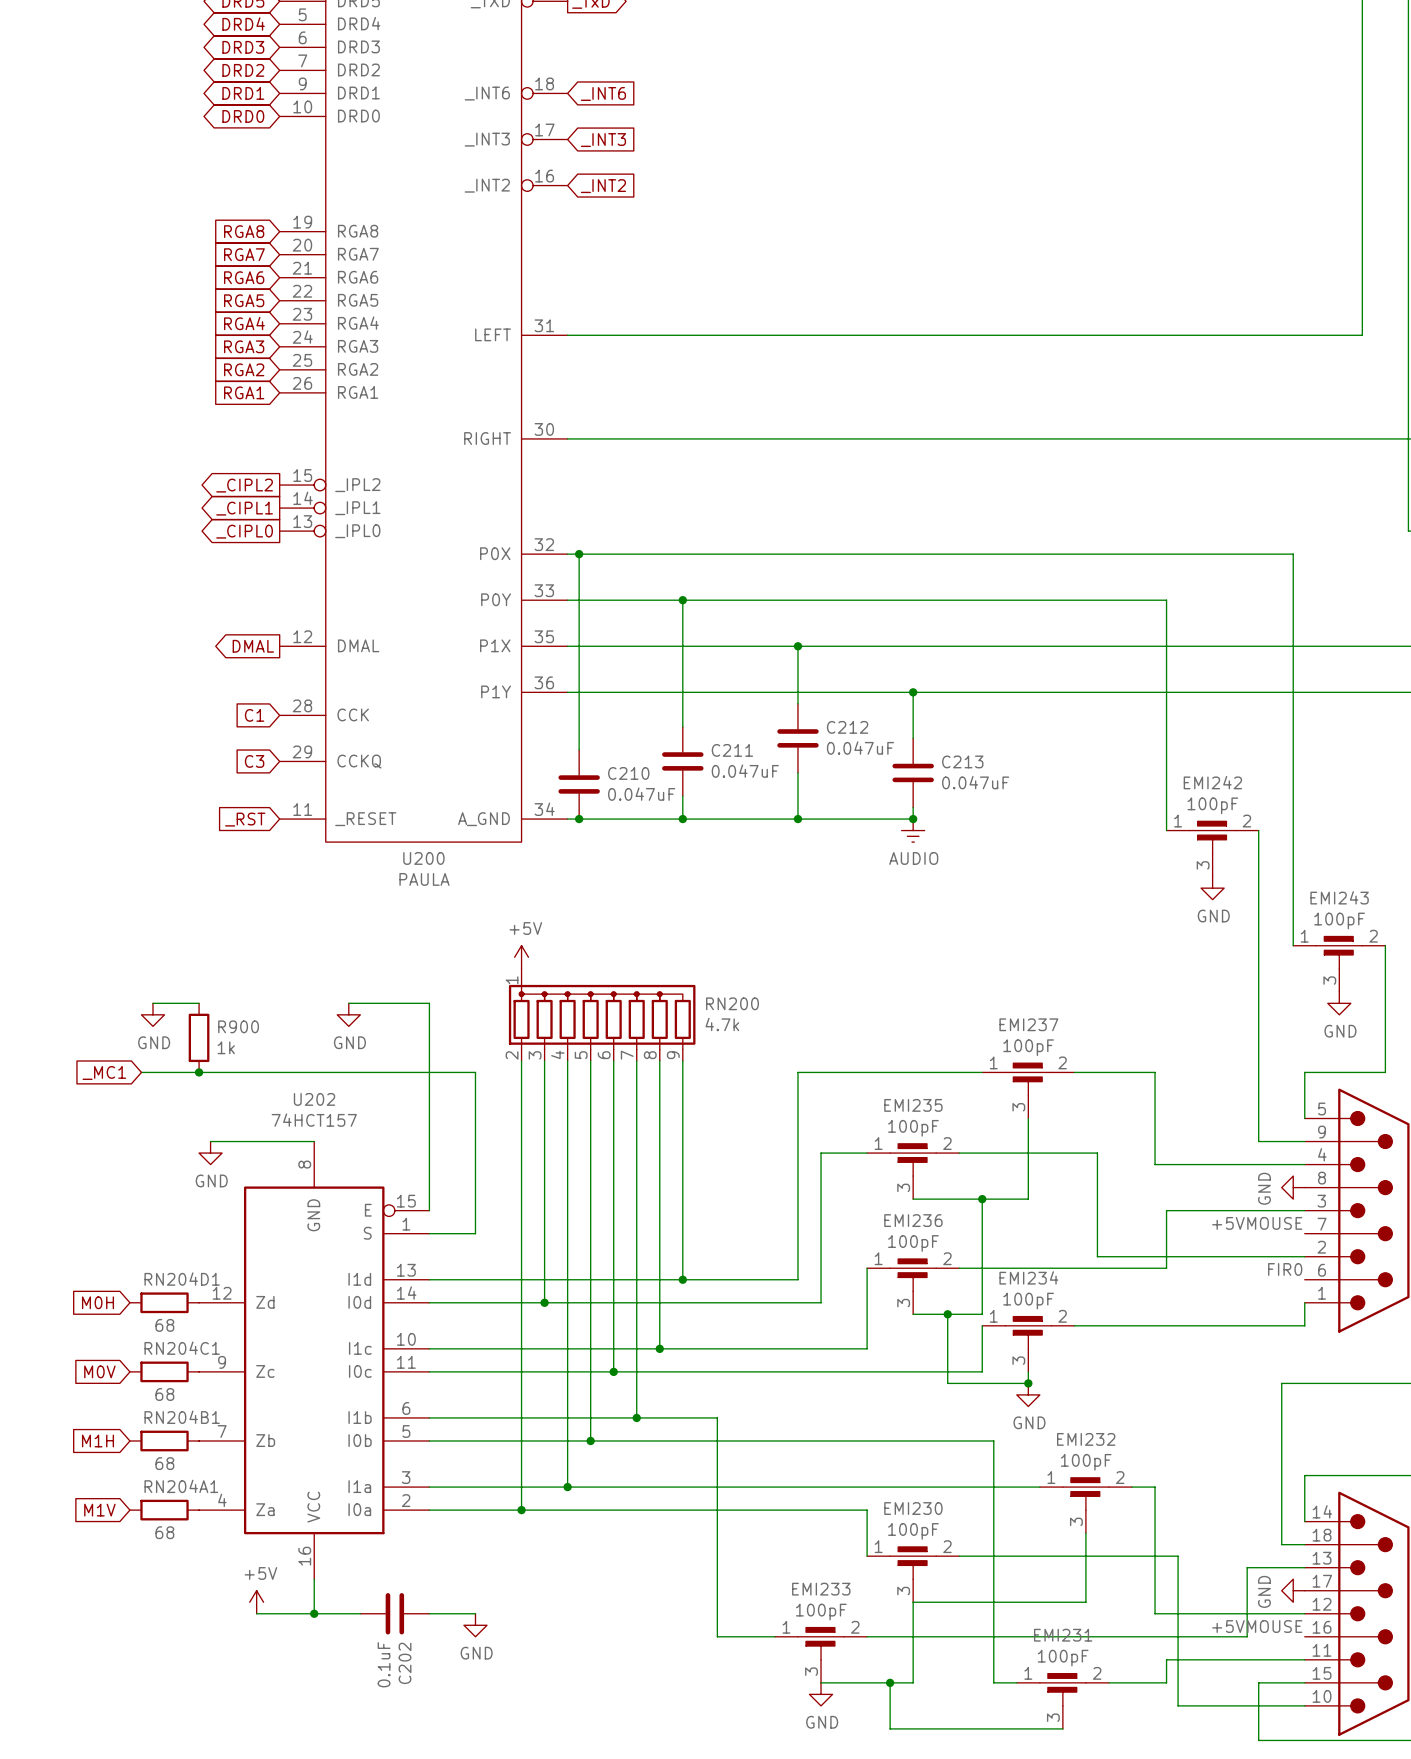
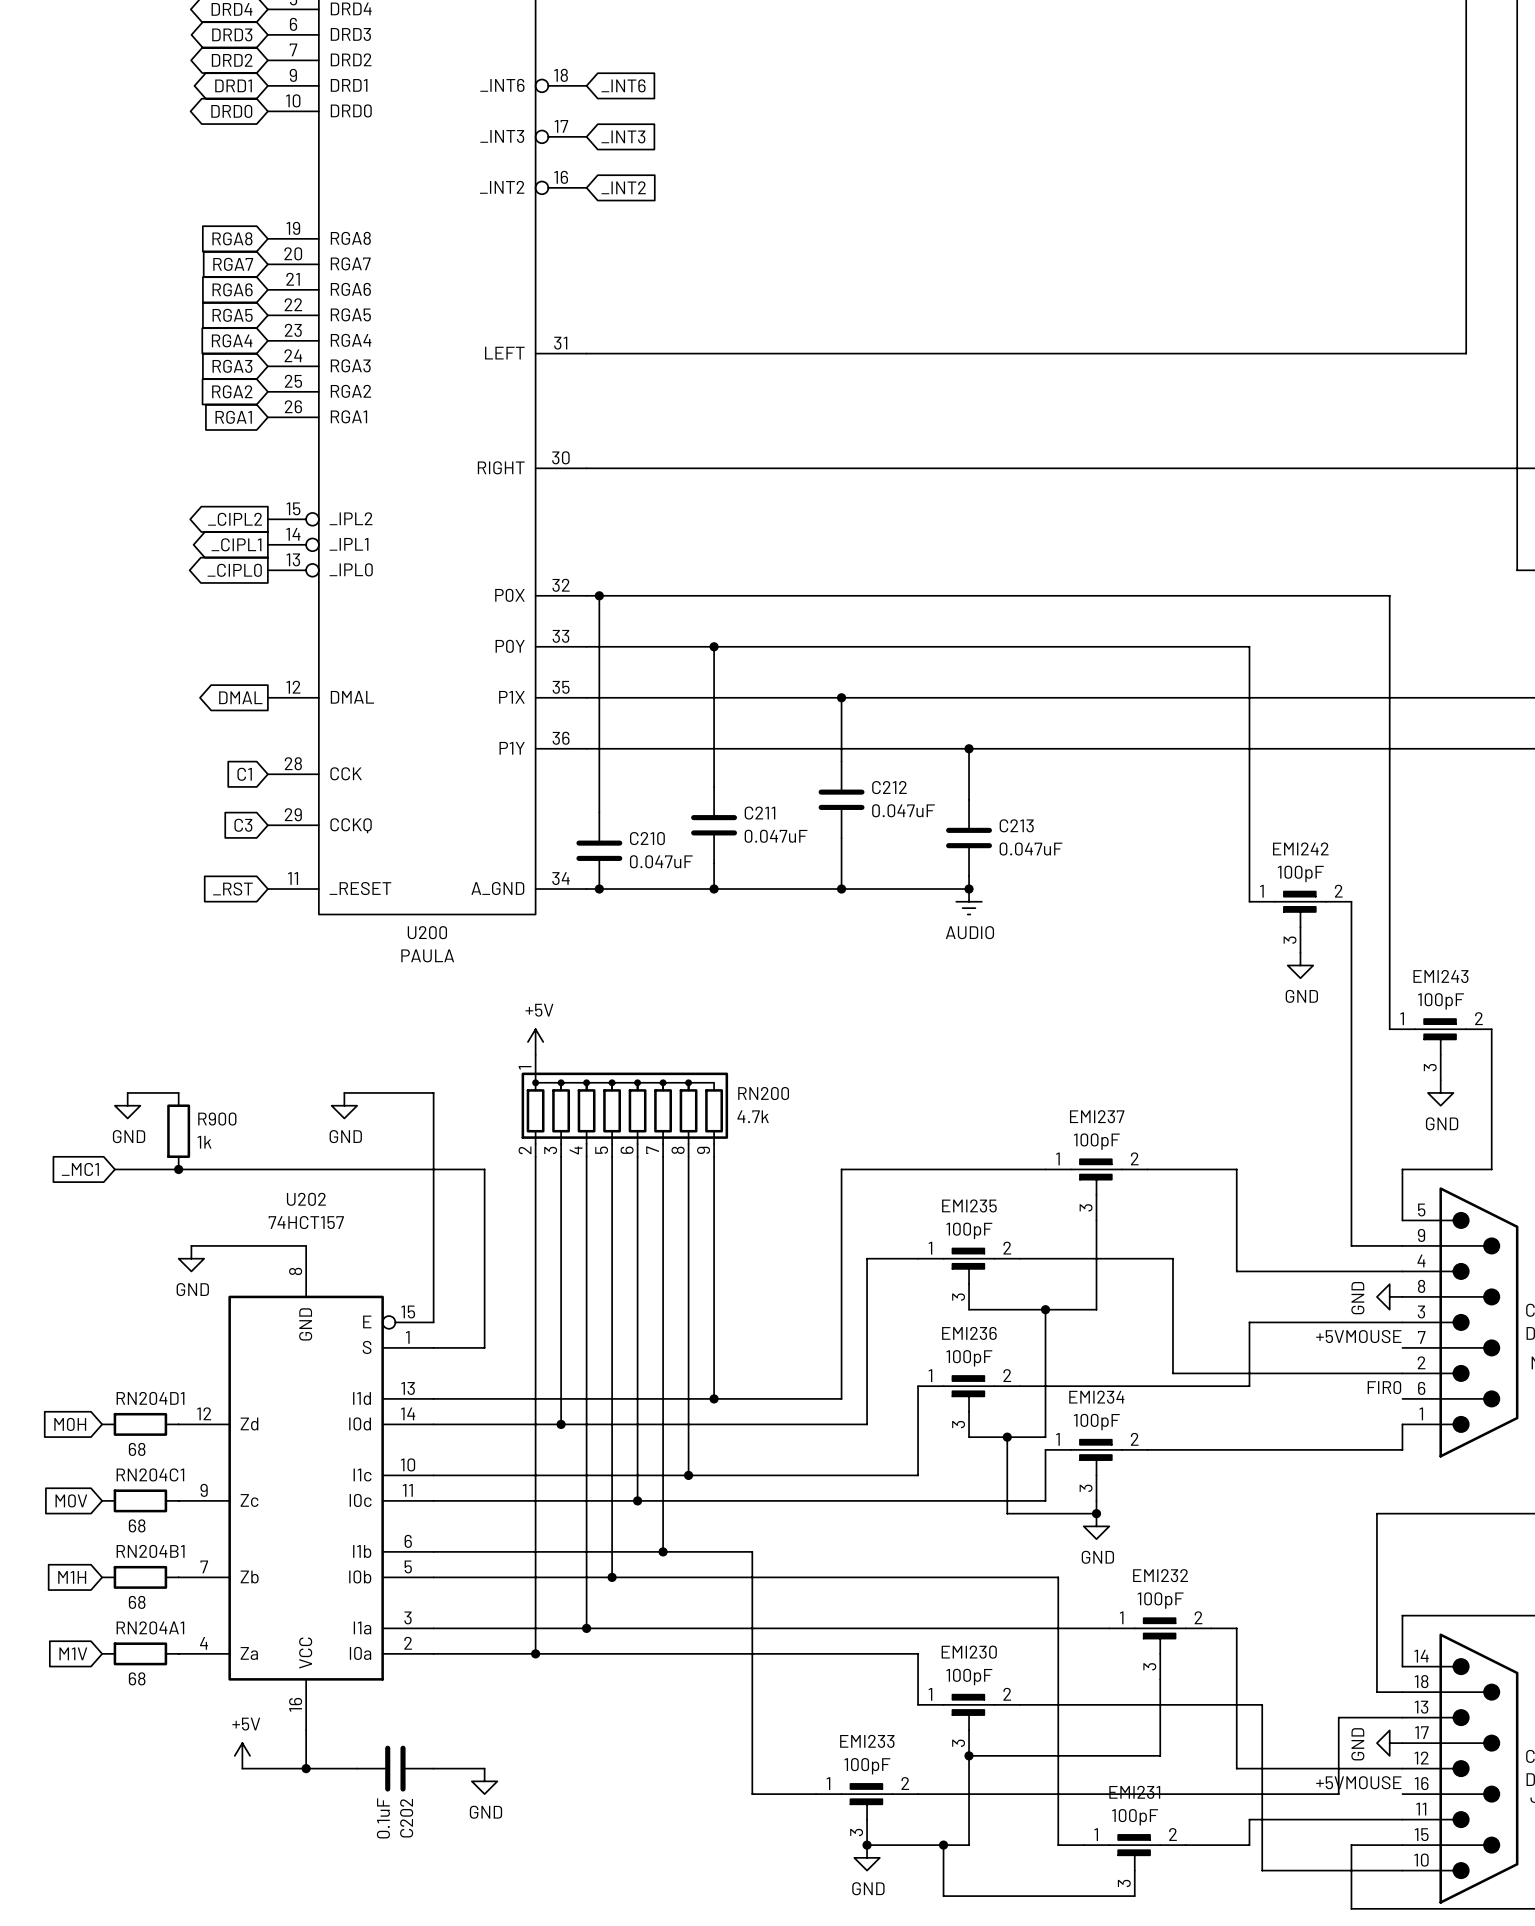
junction: none -> (969, 1755)
junction: none -> (867, 1845)

